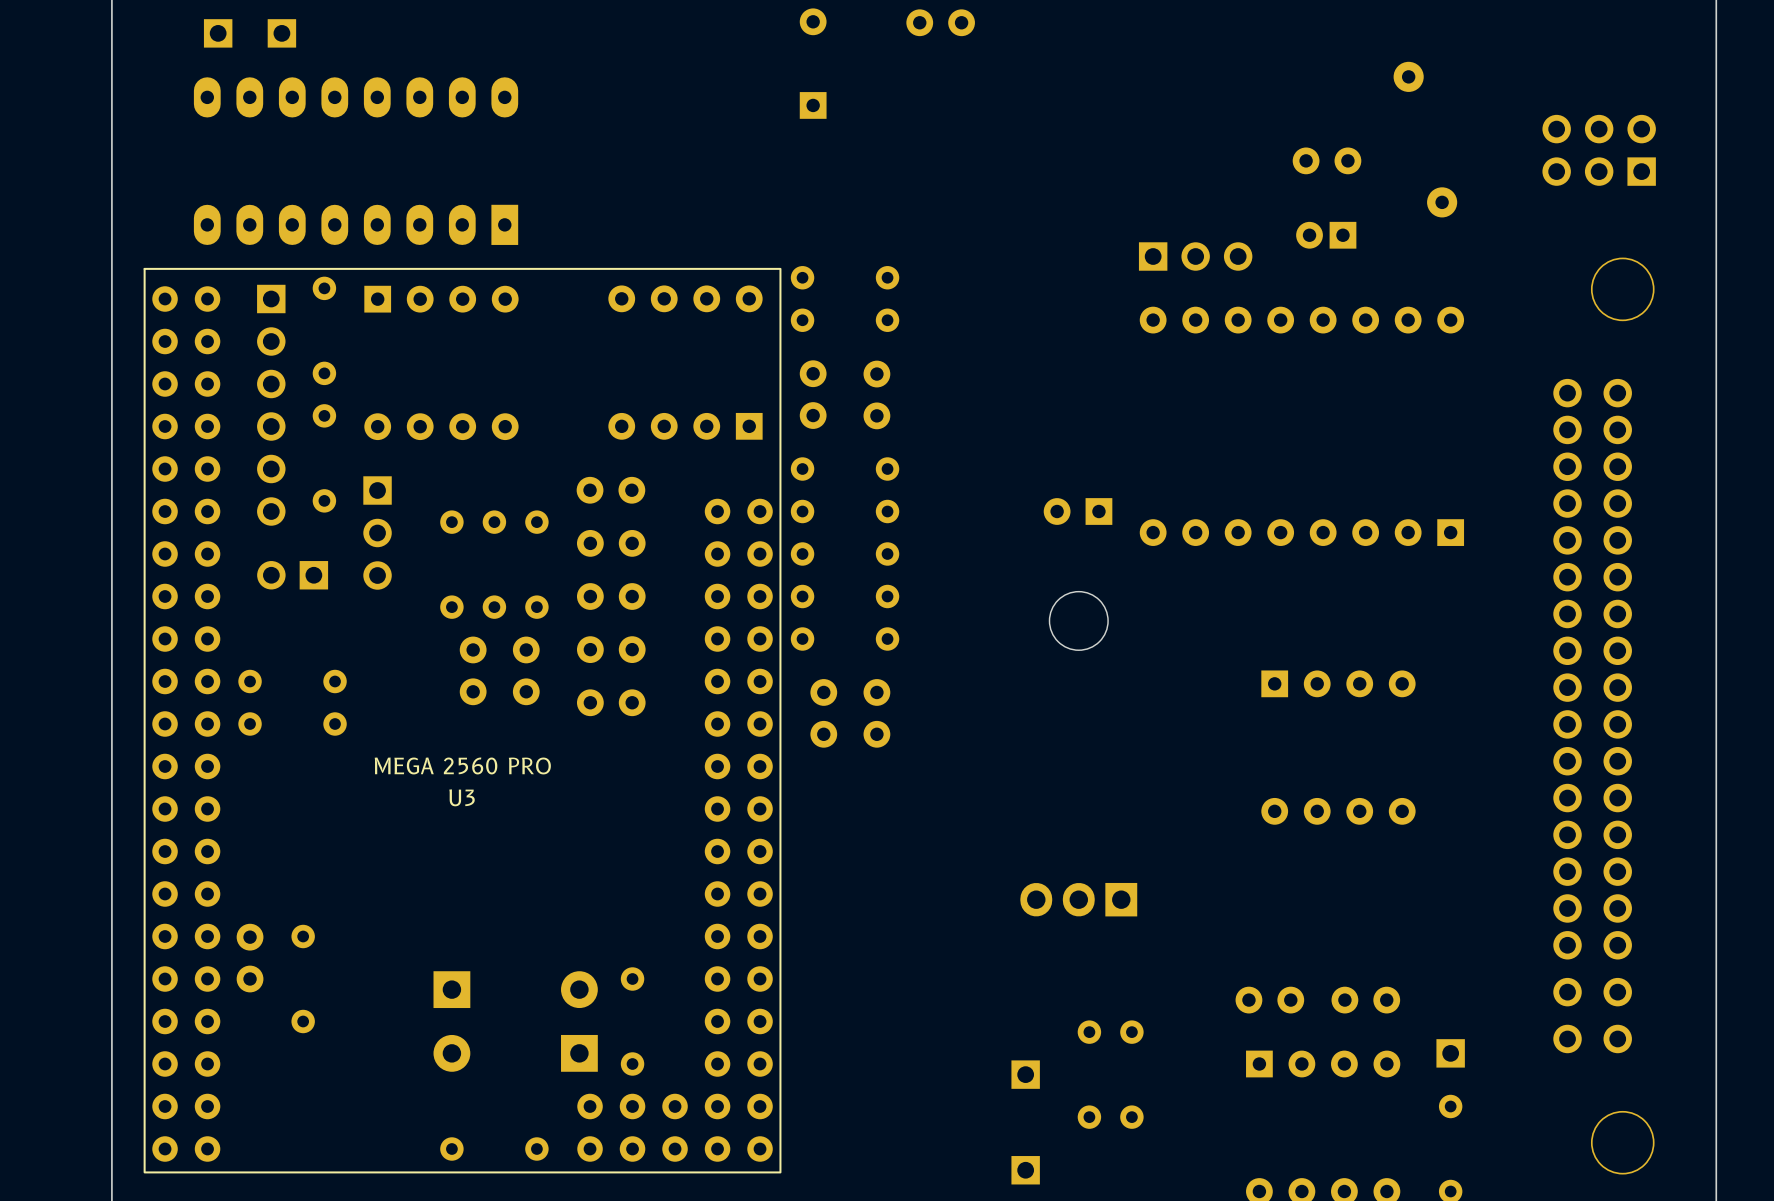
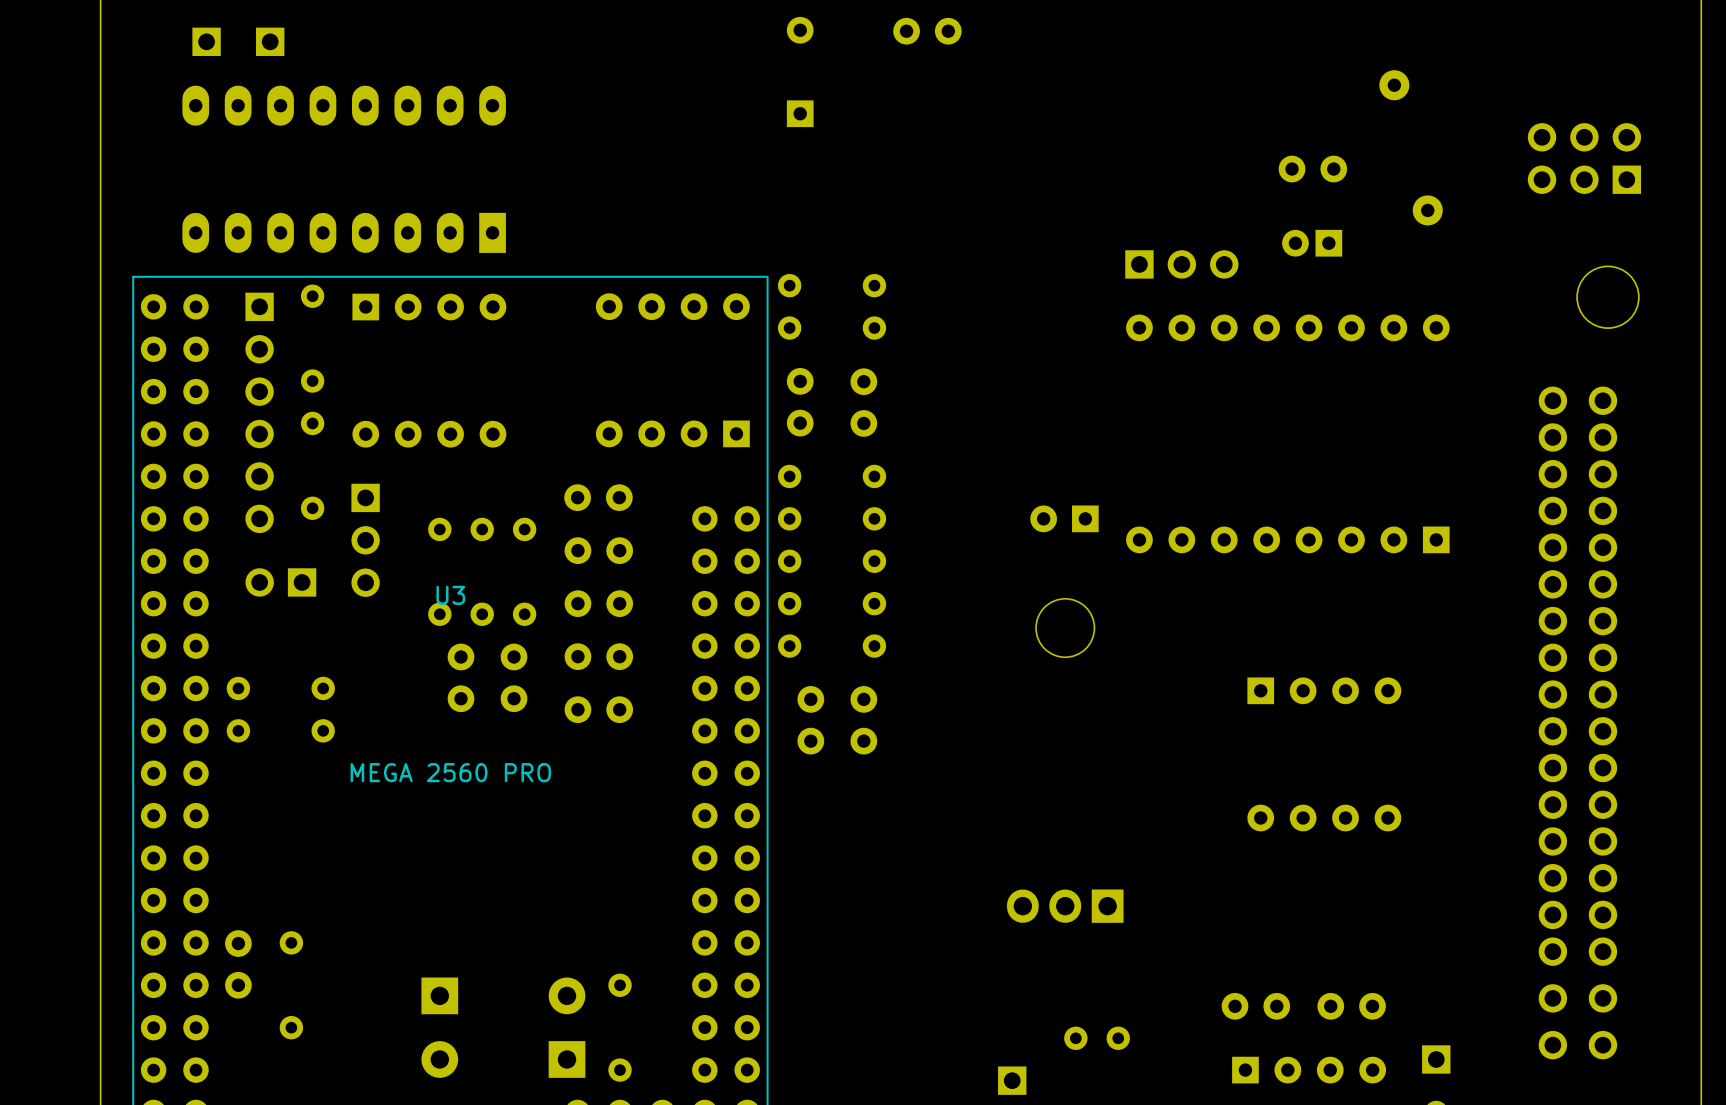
U3 name position: U3 (462, 797) -> U3 (450, 595)

